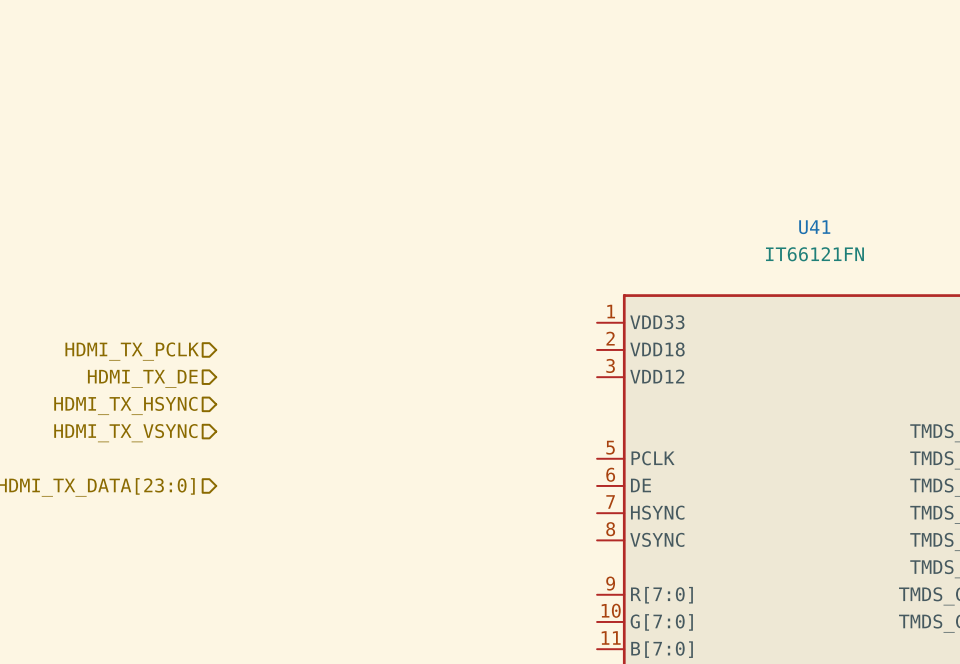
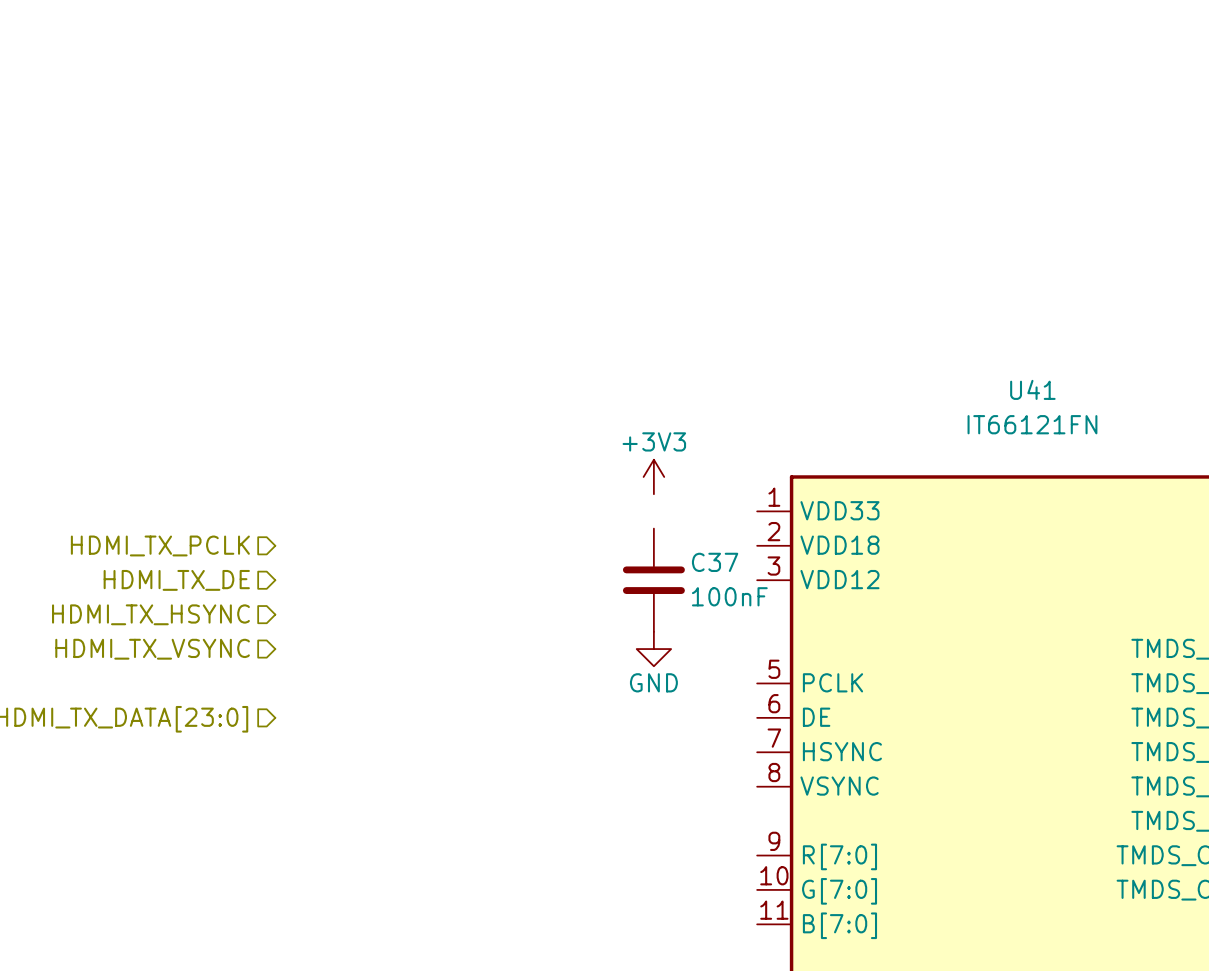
power symbol: none -> +3V3 (653, 476)
C37: none -> 100nF (653, 580)
power symbol: none -> GND (653, 649)

